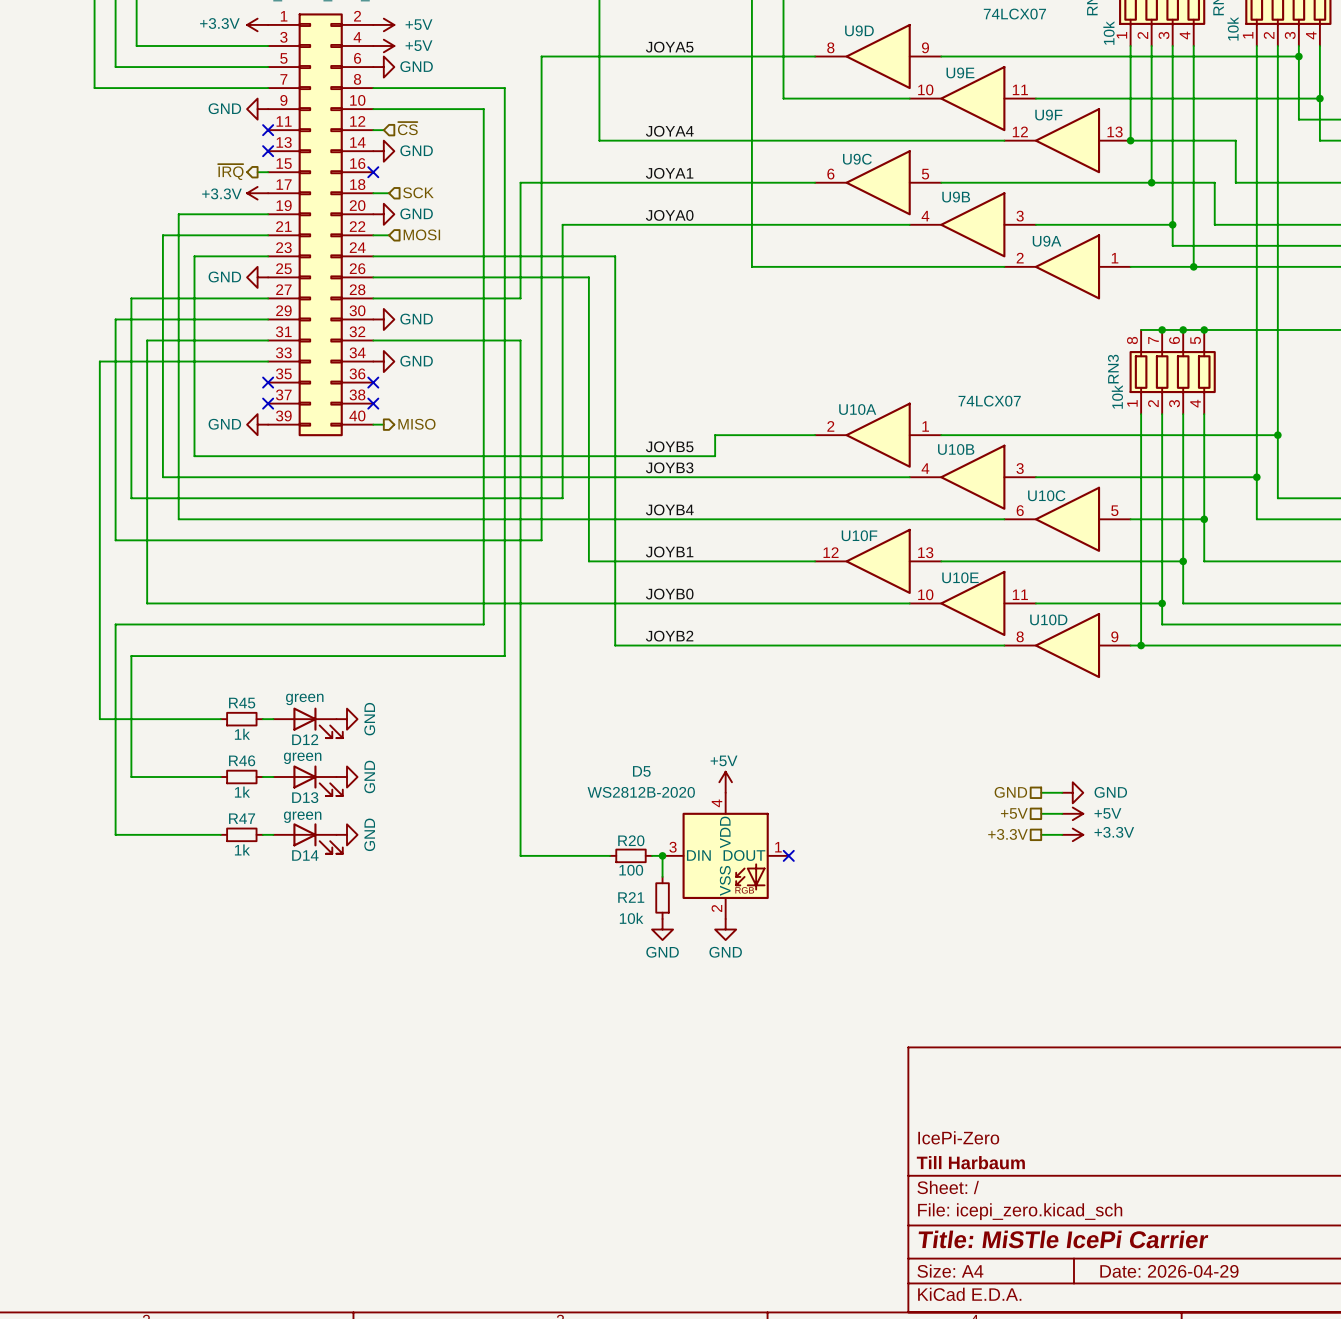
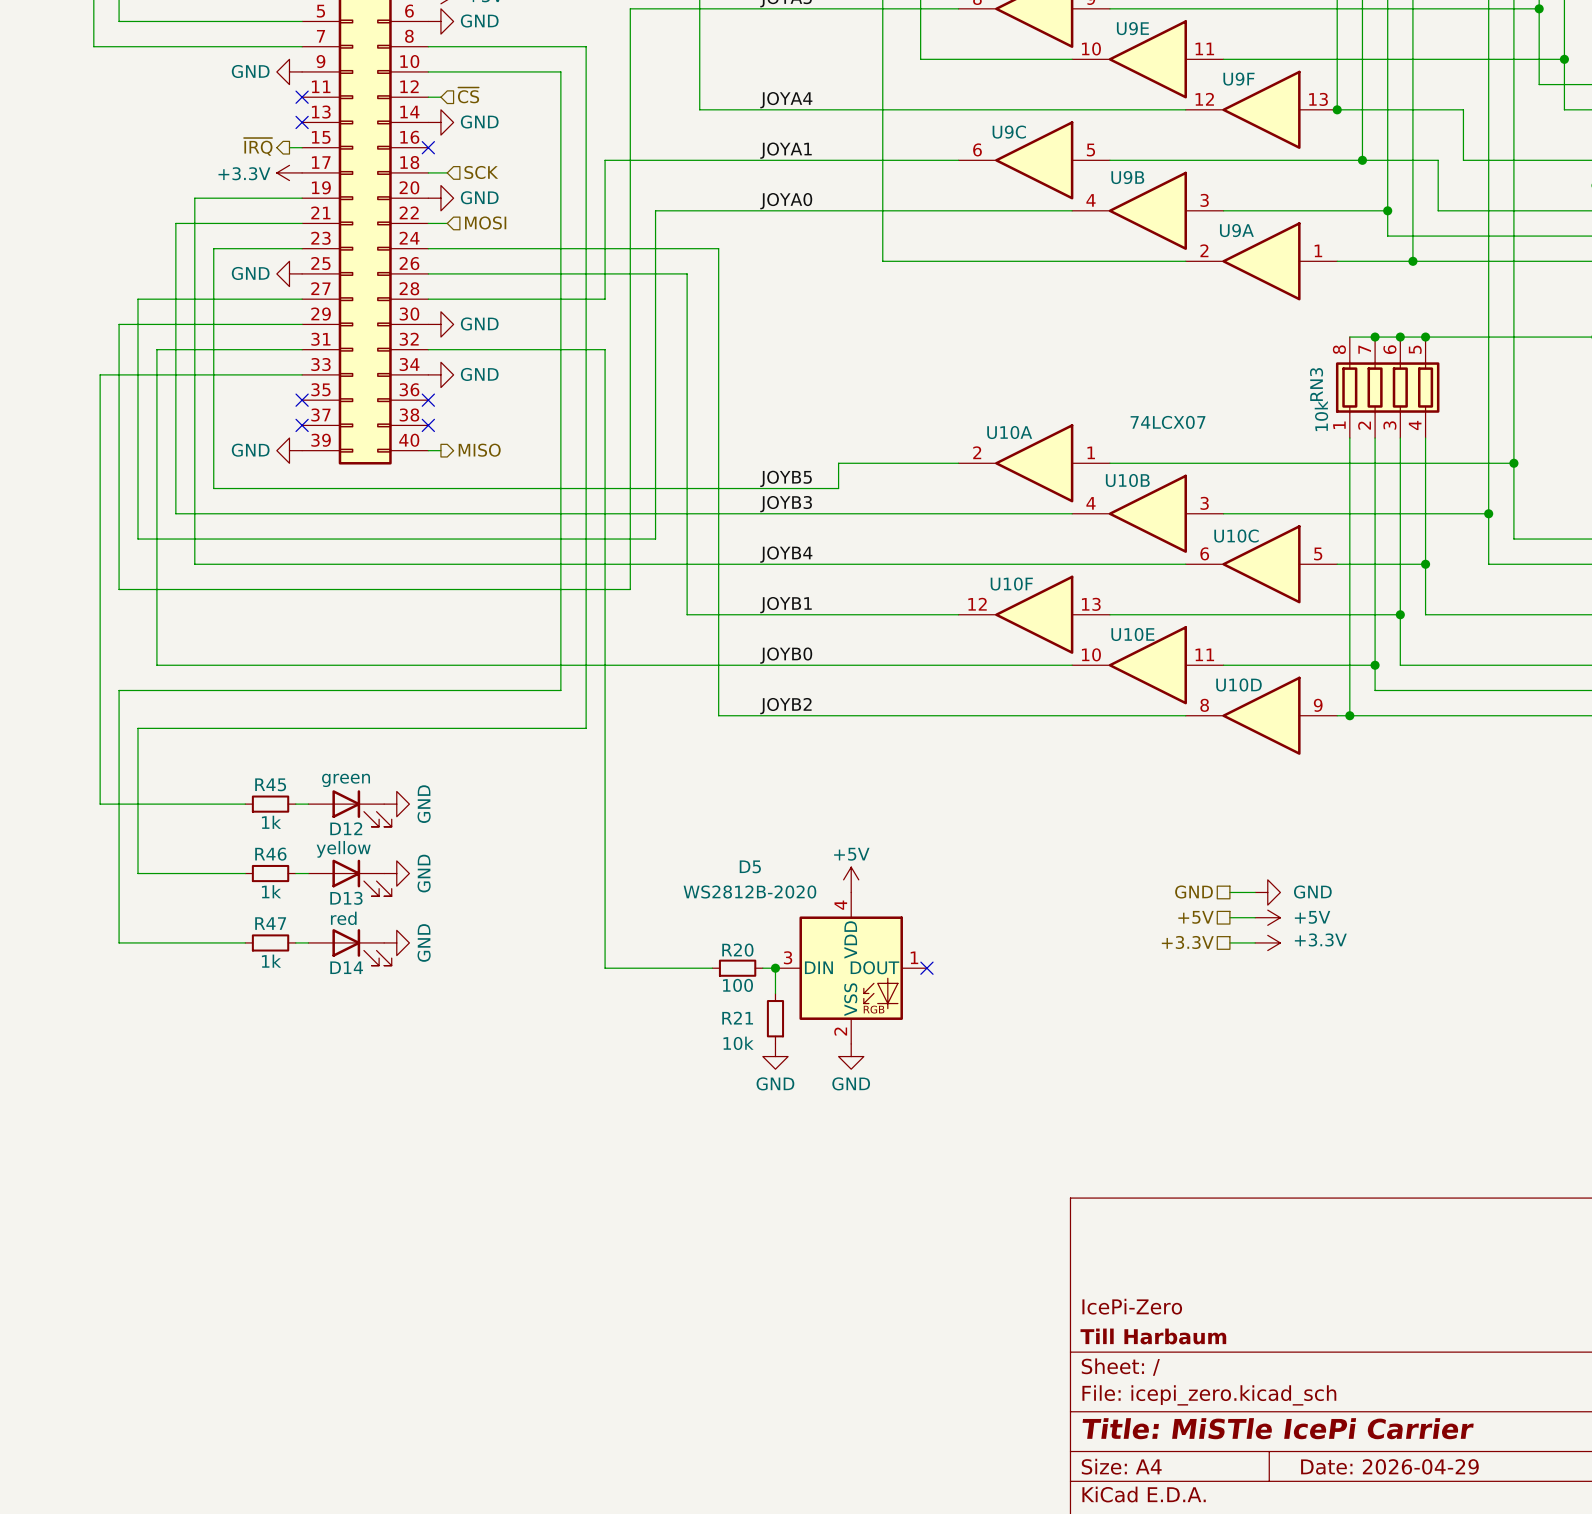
D13 value: green (302, 758) -> yellow (343, 849)
D14 value: green (302, 817) -> red (343, 918)

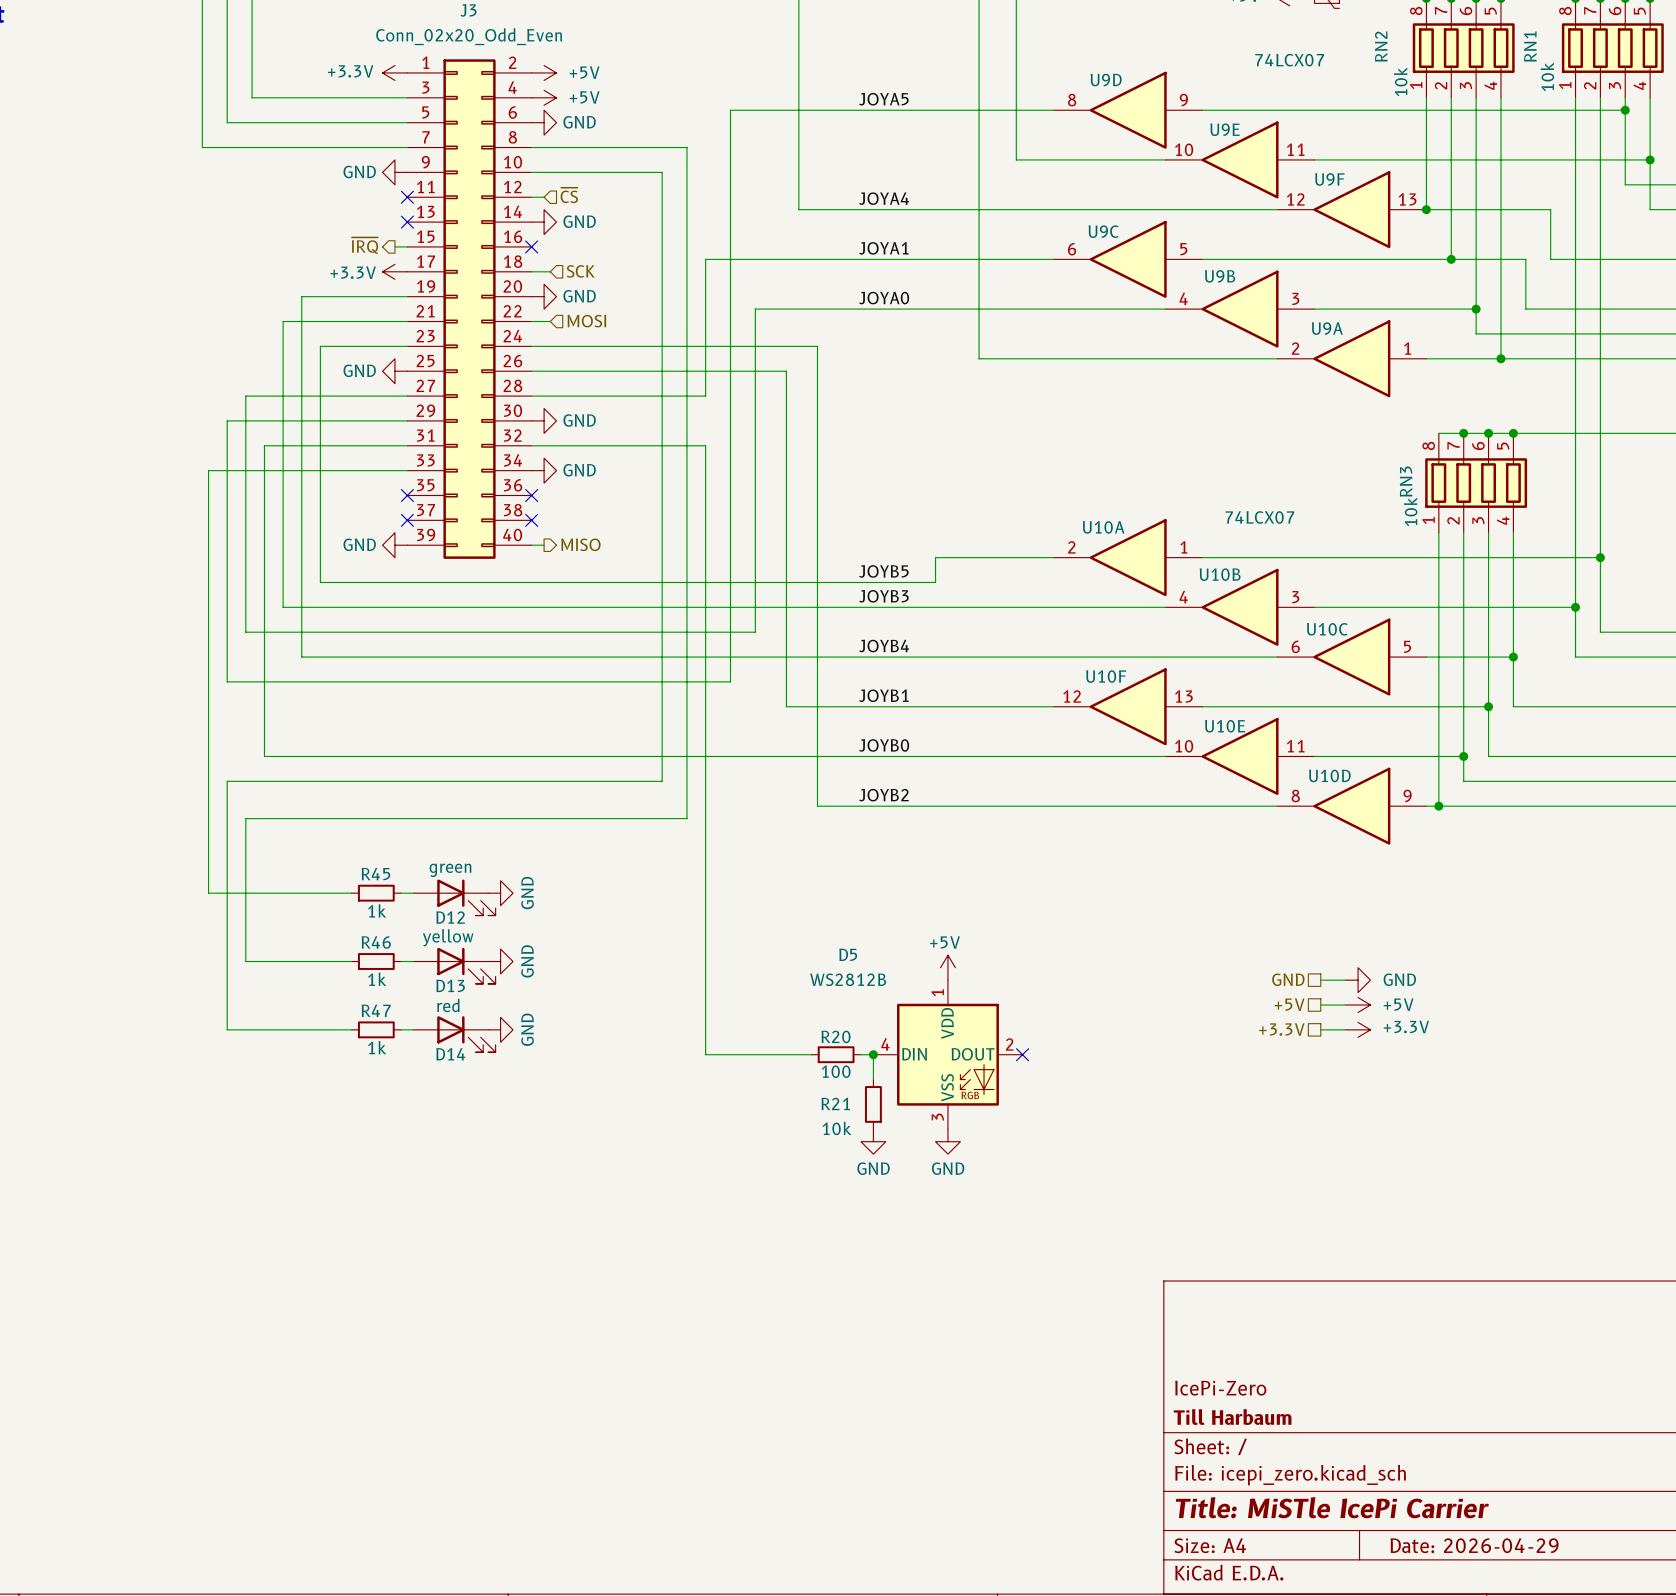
D5 value: WS2812B-2020 (749, 892) -> WS2812B (848, 979)
D5 pin number: 4 (840, 905) -> 1 (937, 992)
D5 pin number: 3 (788, 957) -> 4 (885, 1044)
D5 pin number: 1 (914, 957) -> 2 (1009, 1044)
D5 pin number: 2 (840, 1031) -> 3 (937, 1117)

